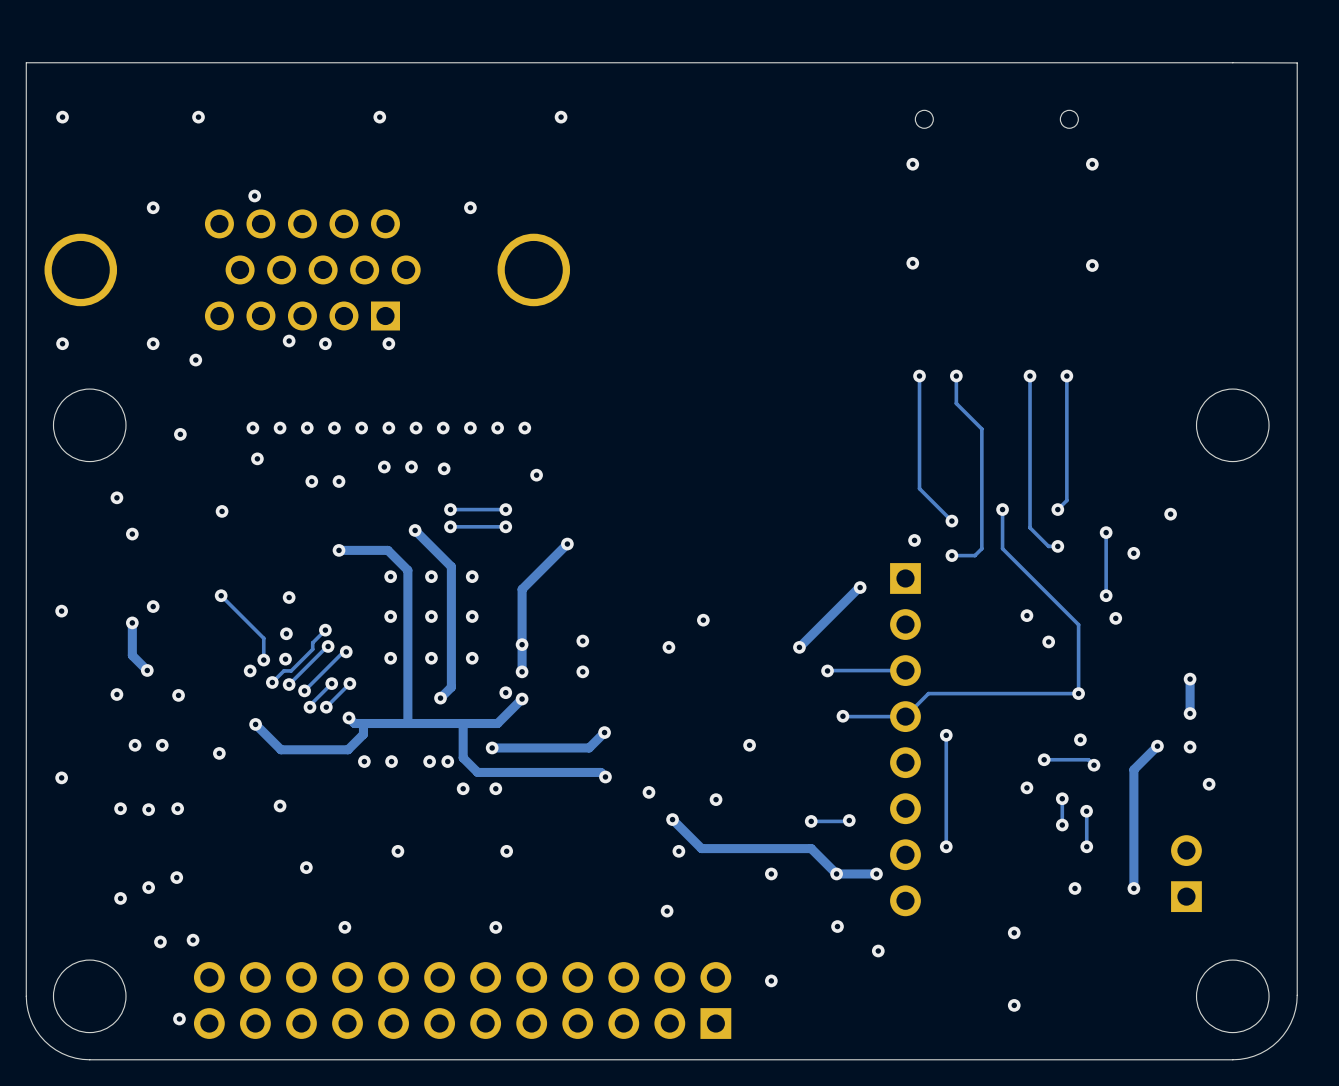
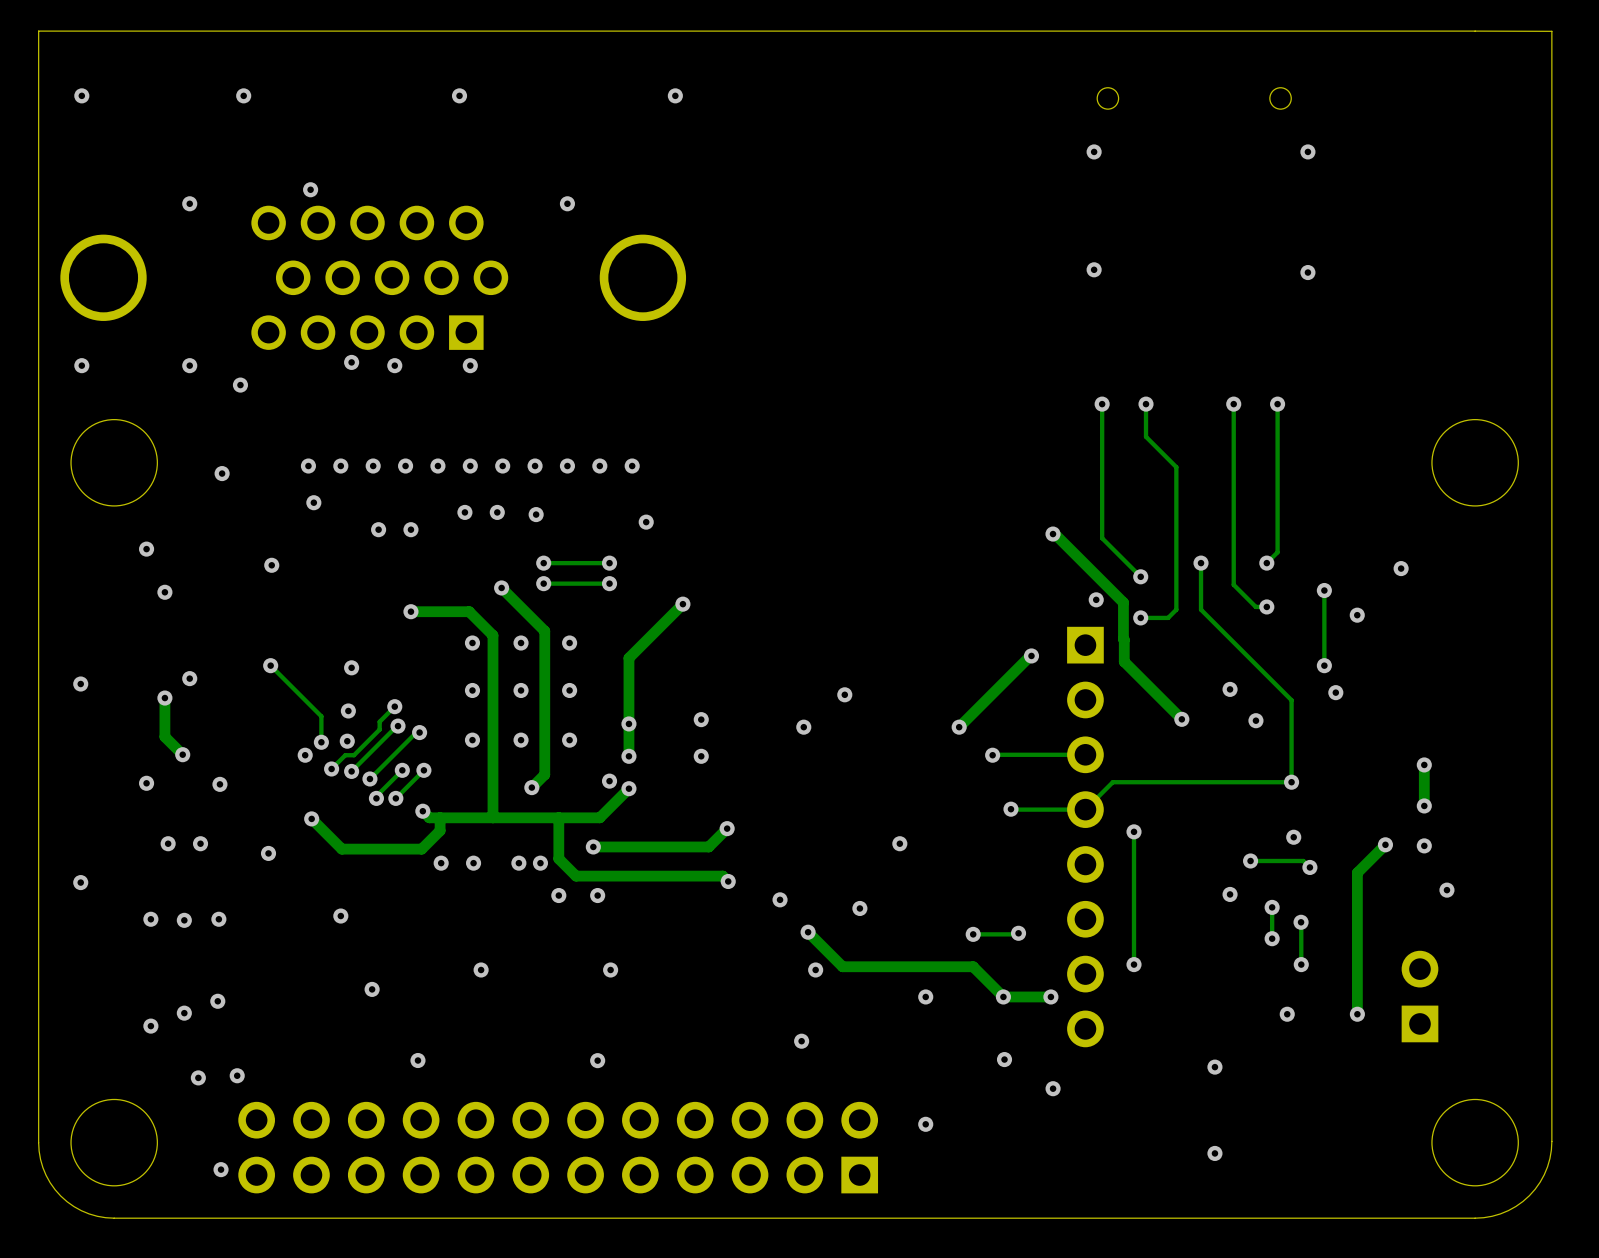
track: none -> (1053, 534) (1123, 602) (1124, 661) (1181, 719)
via: none -> (1053, 534)
via: none -> (1181, 719)

